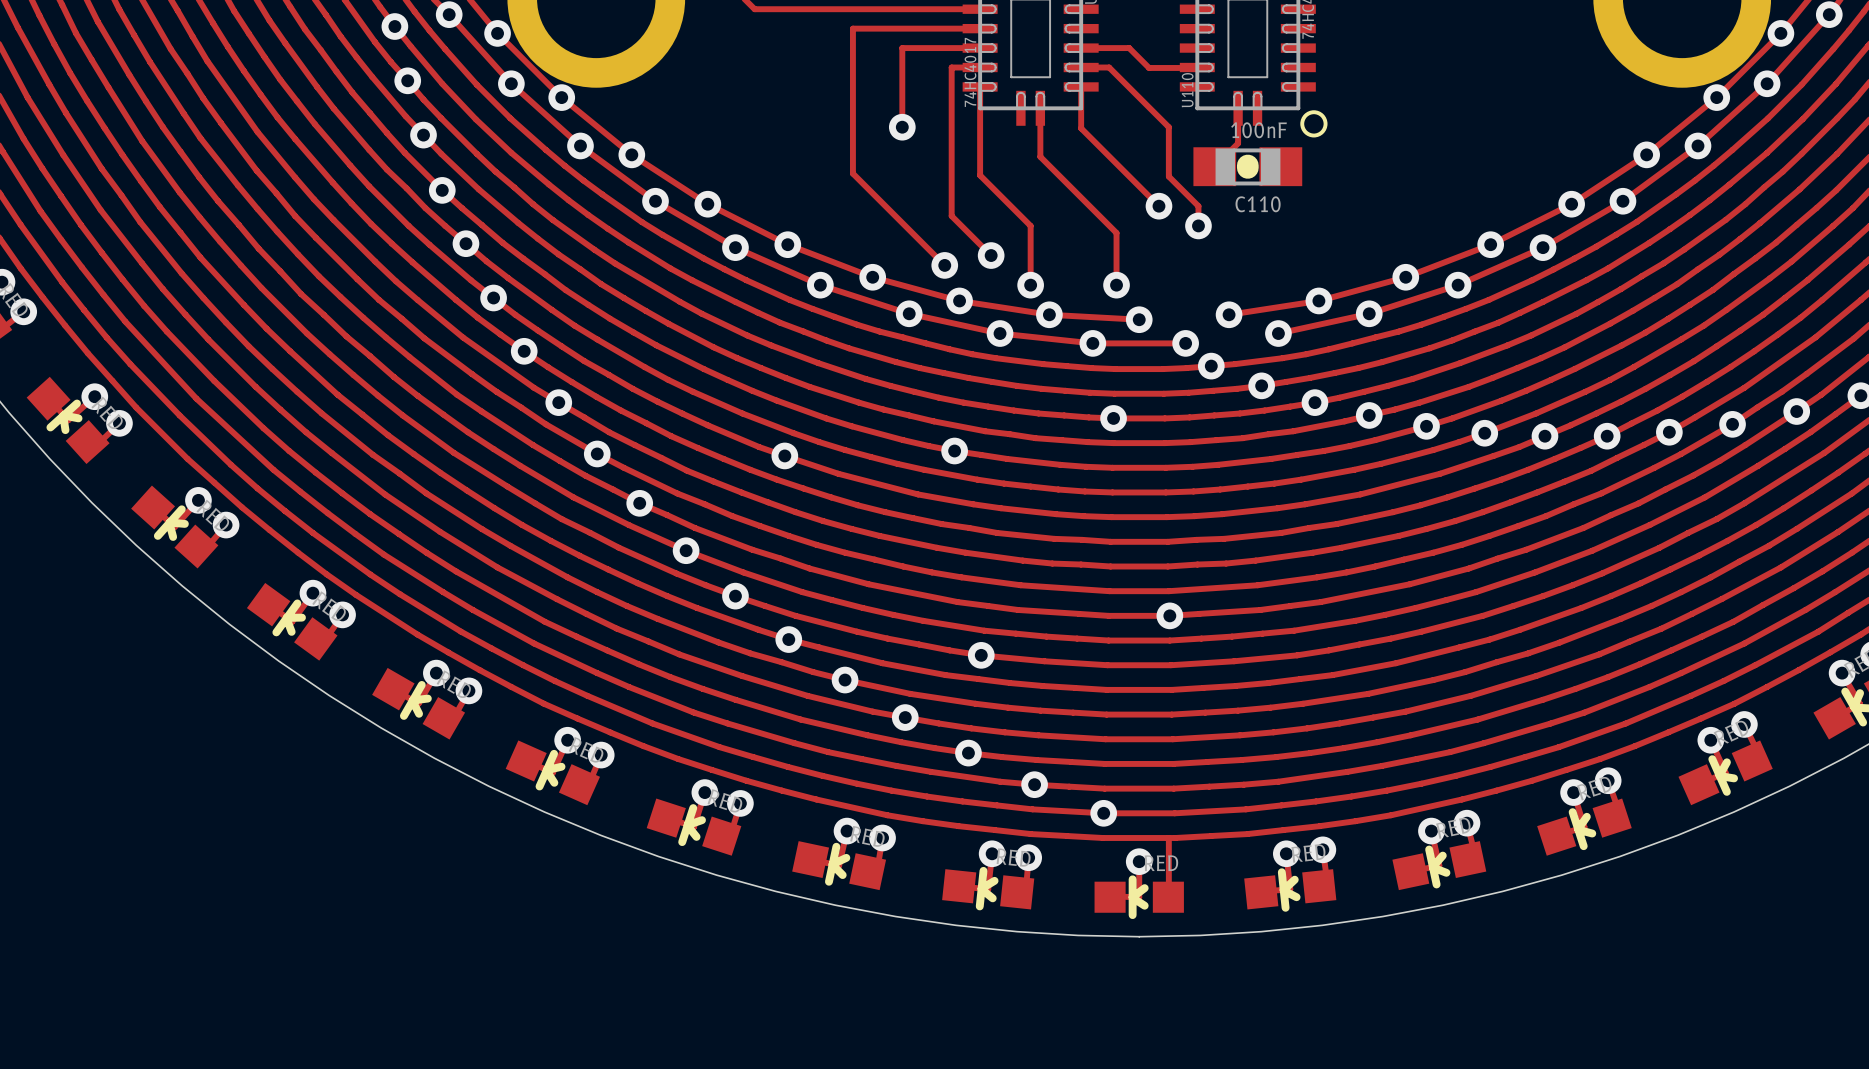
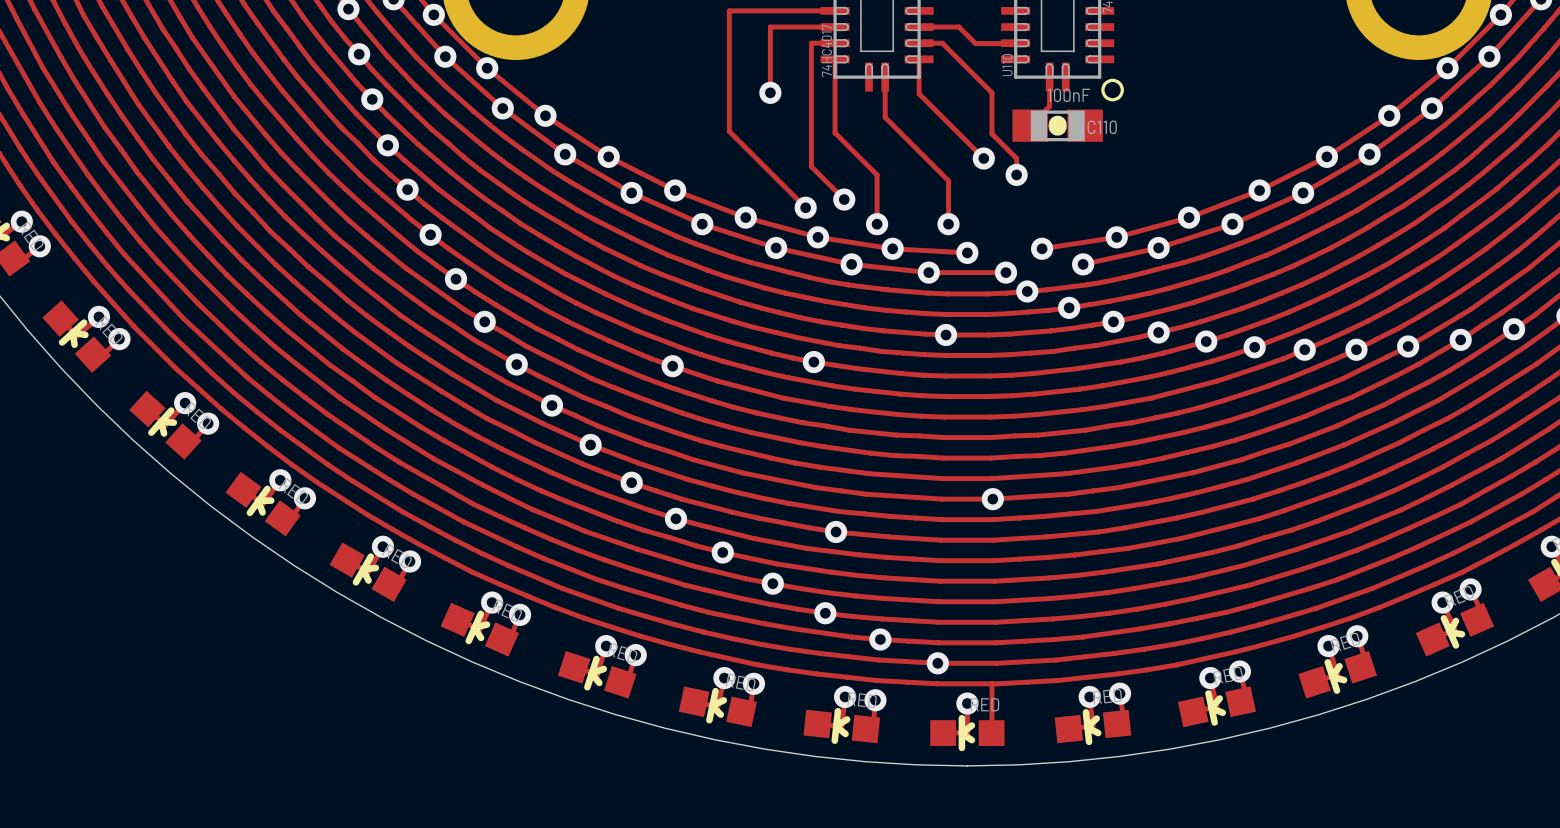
C110 name position: C110 (1258, 204) -> C110 (1102, 127)

